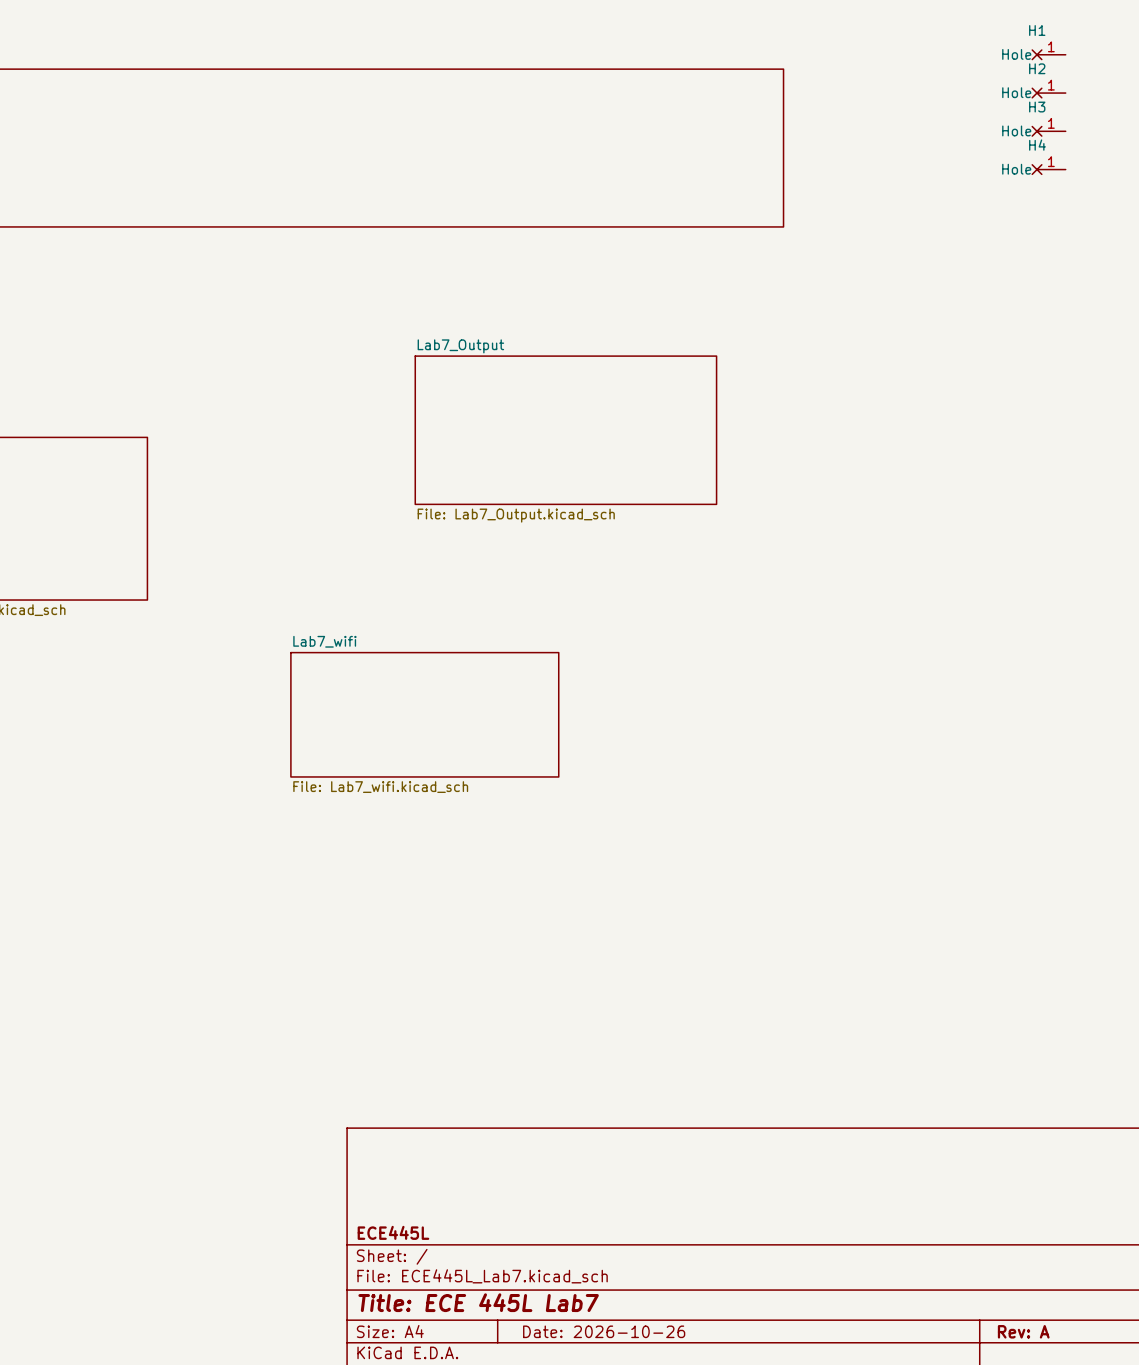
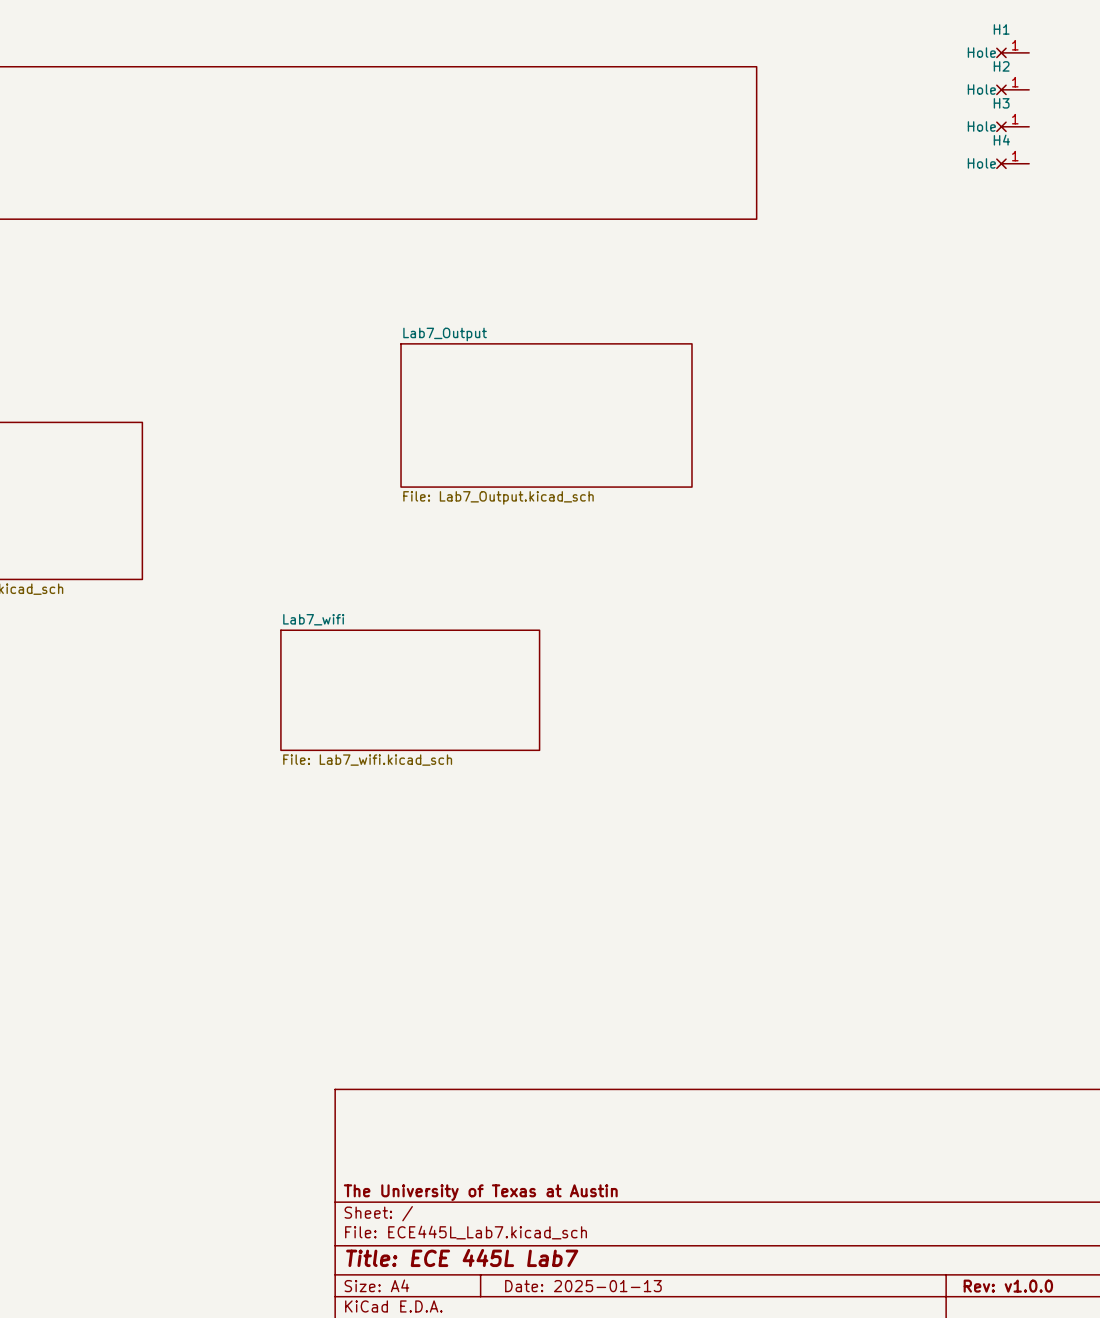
title block: ECE445L (393, 1232) -> The University of Texas at Austin (480, 1192)
title block: Date: 2026-10-26 (604, 1331) -> Date: 2025-01-13 (583, 1286)
title block: Rev: A (1023, 1331) -> Rev: v1.0.0 (1008, 1286)

